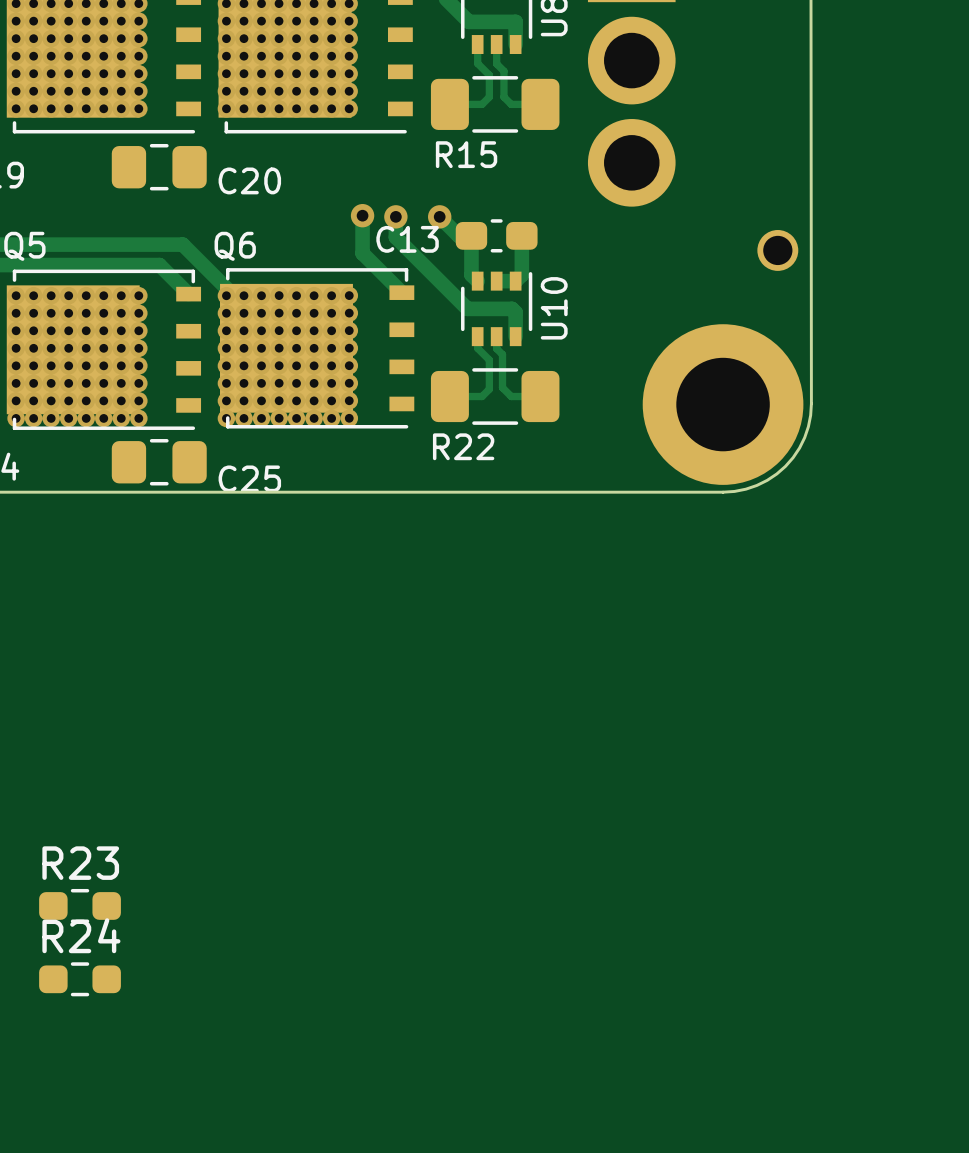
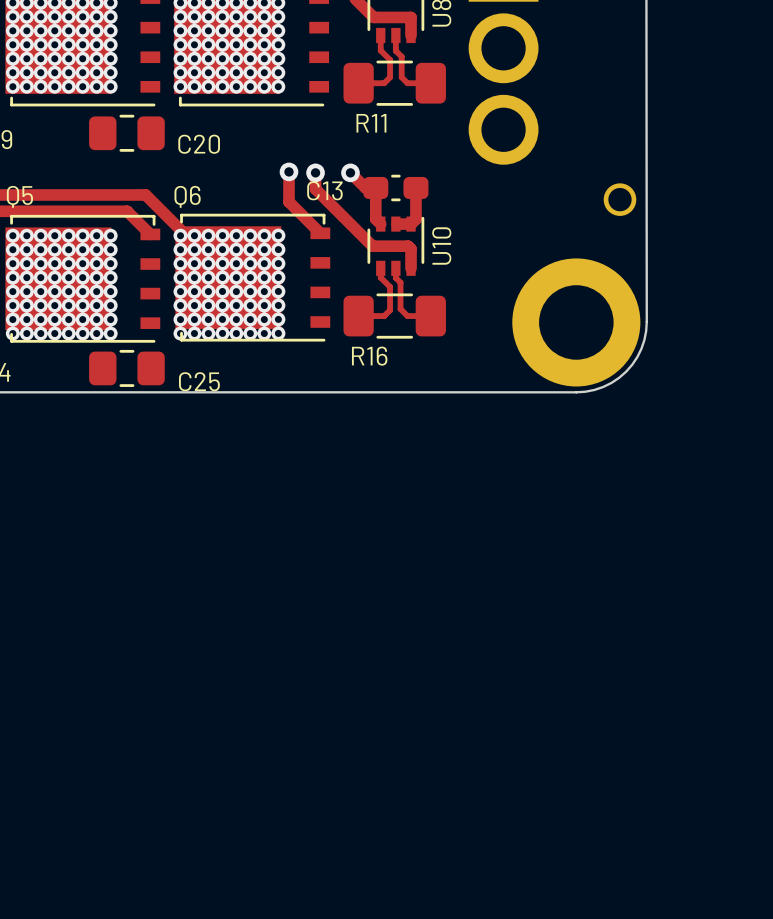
R15 name: R15 (466, 154) -> R11 (371, 123)
R22 name: R22 (463, 446) -> R16 (369, 356)
R23: (80, 905) -> none
R24: (80, 979) -> none

